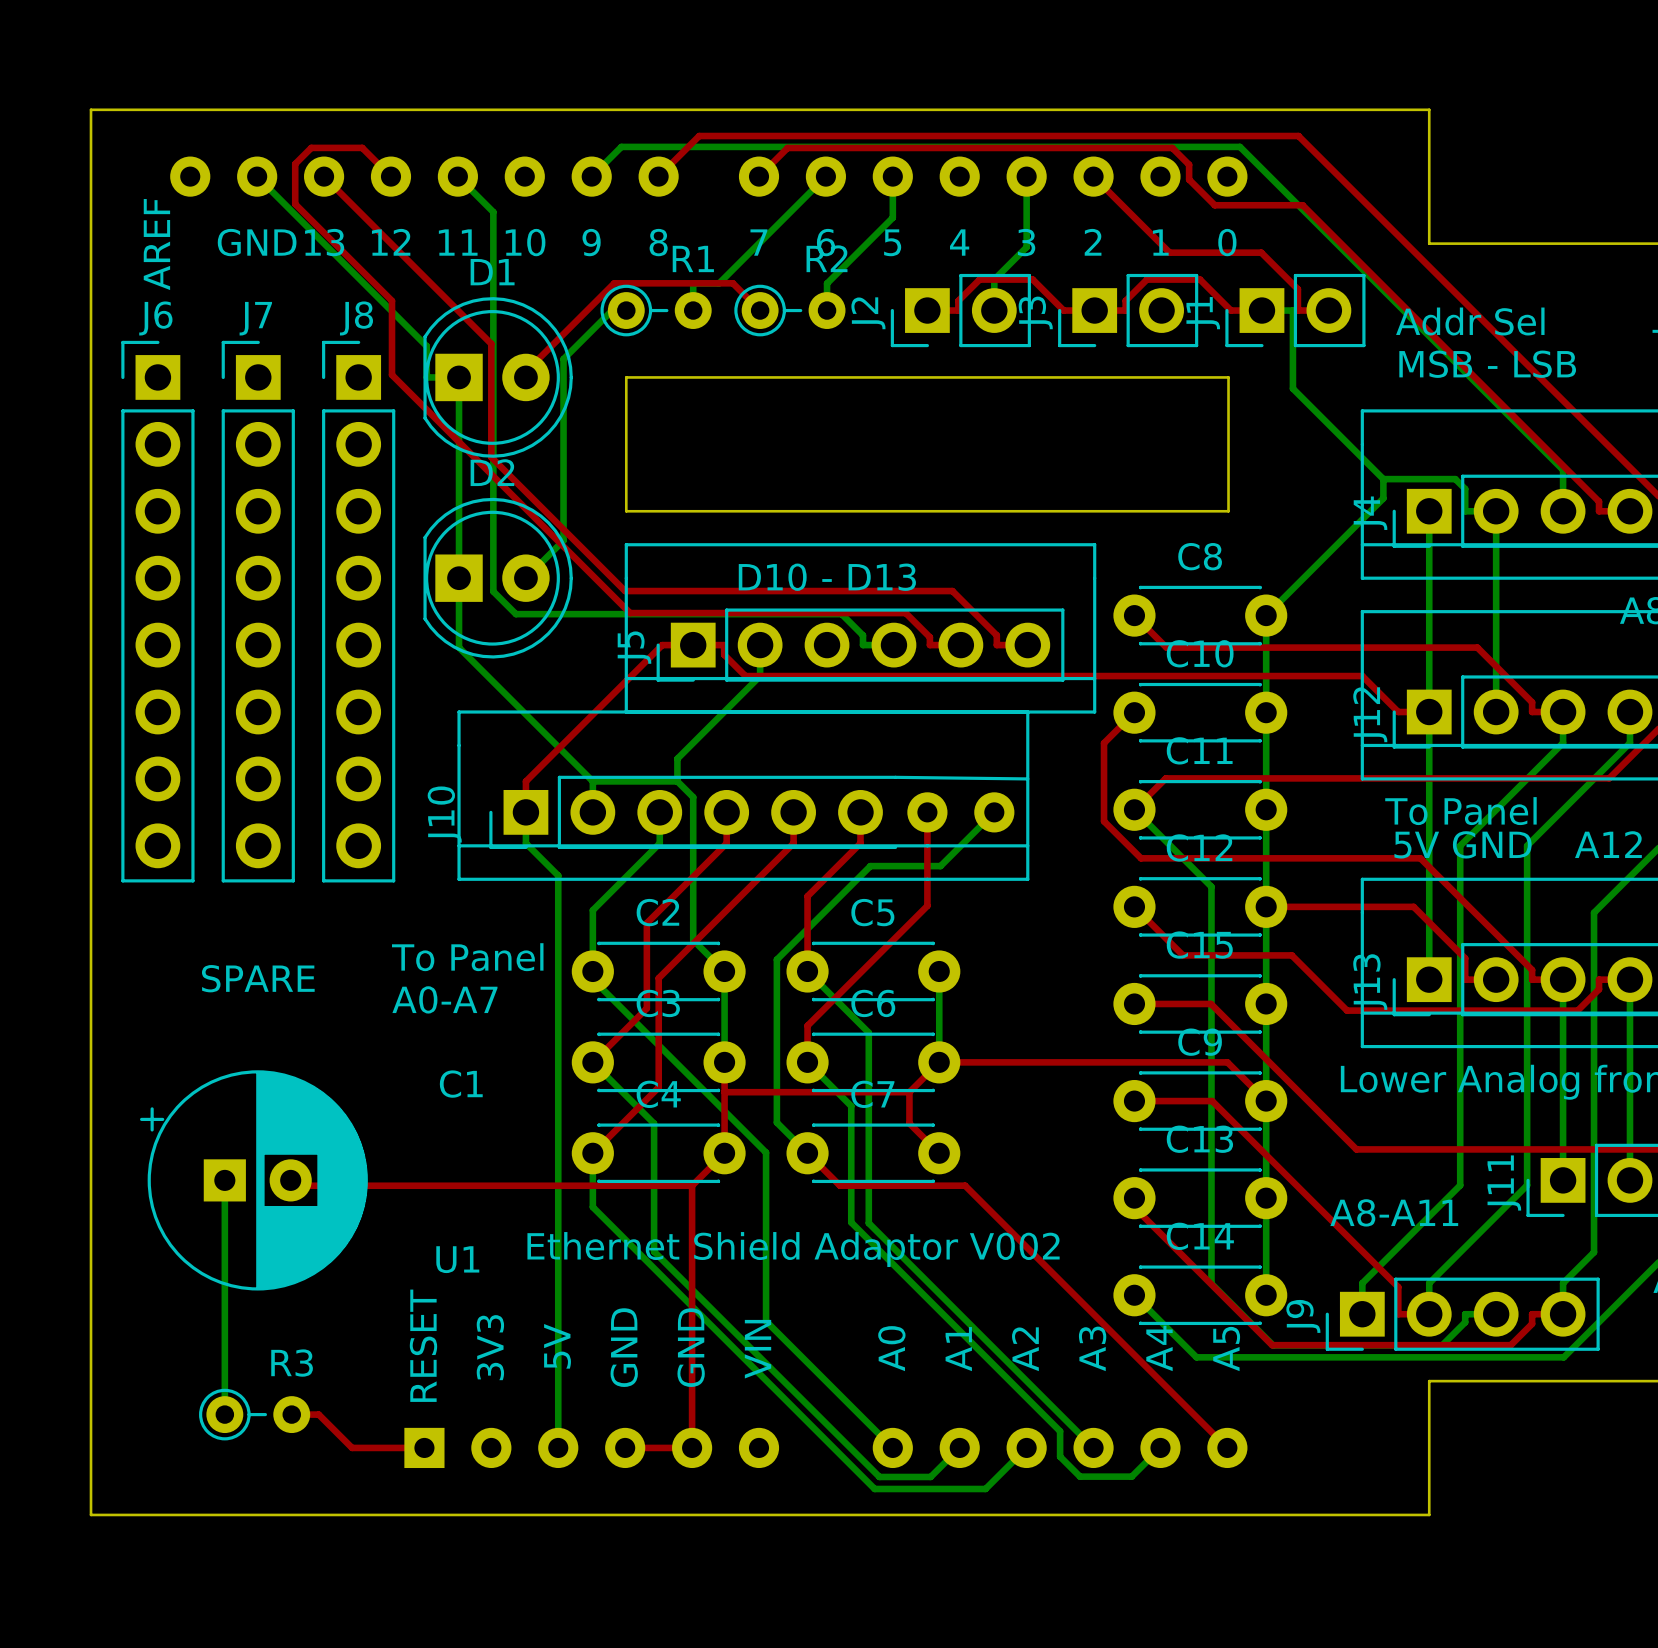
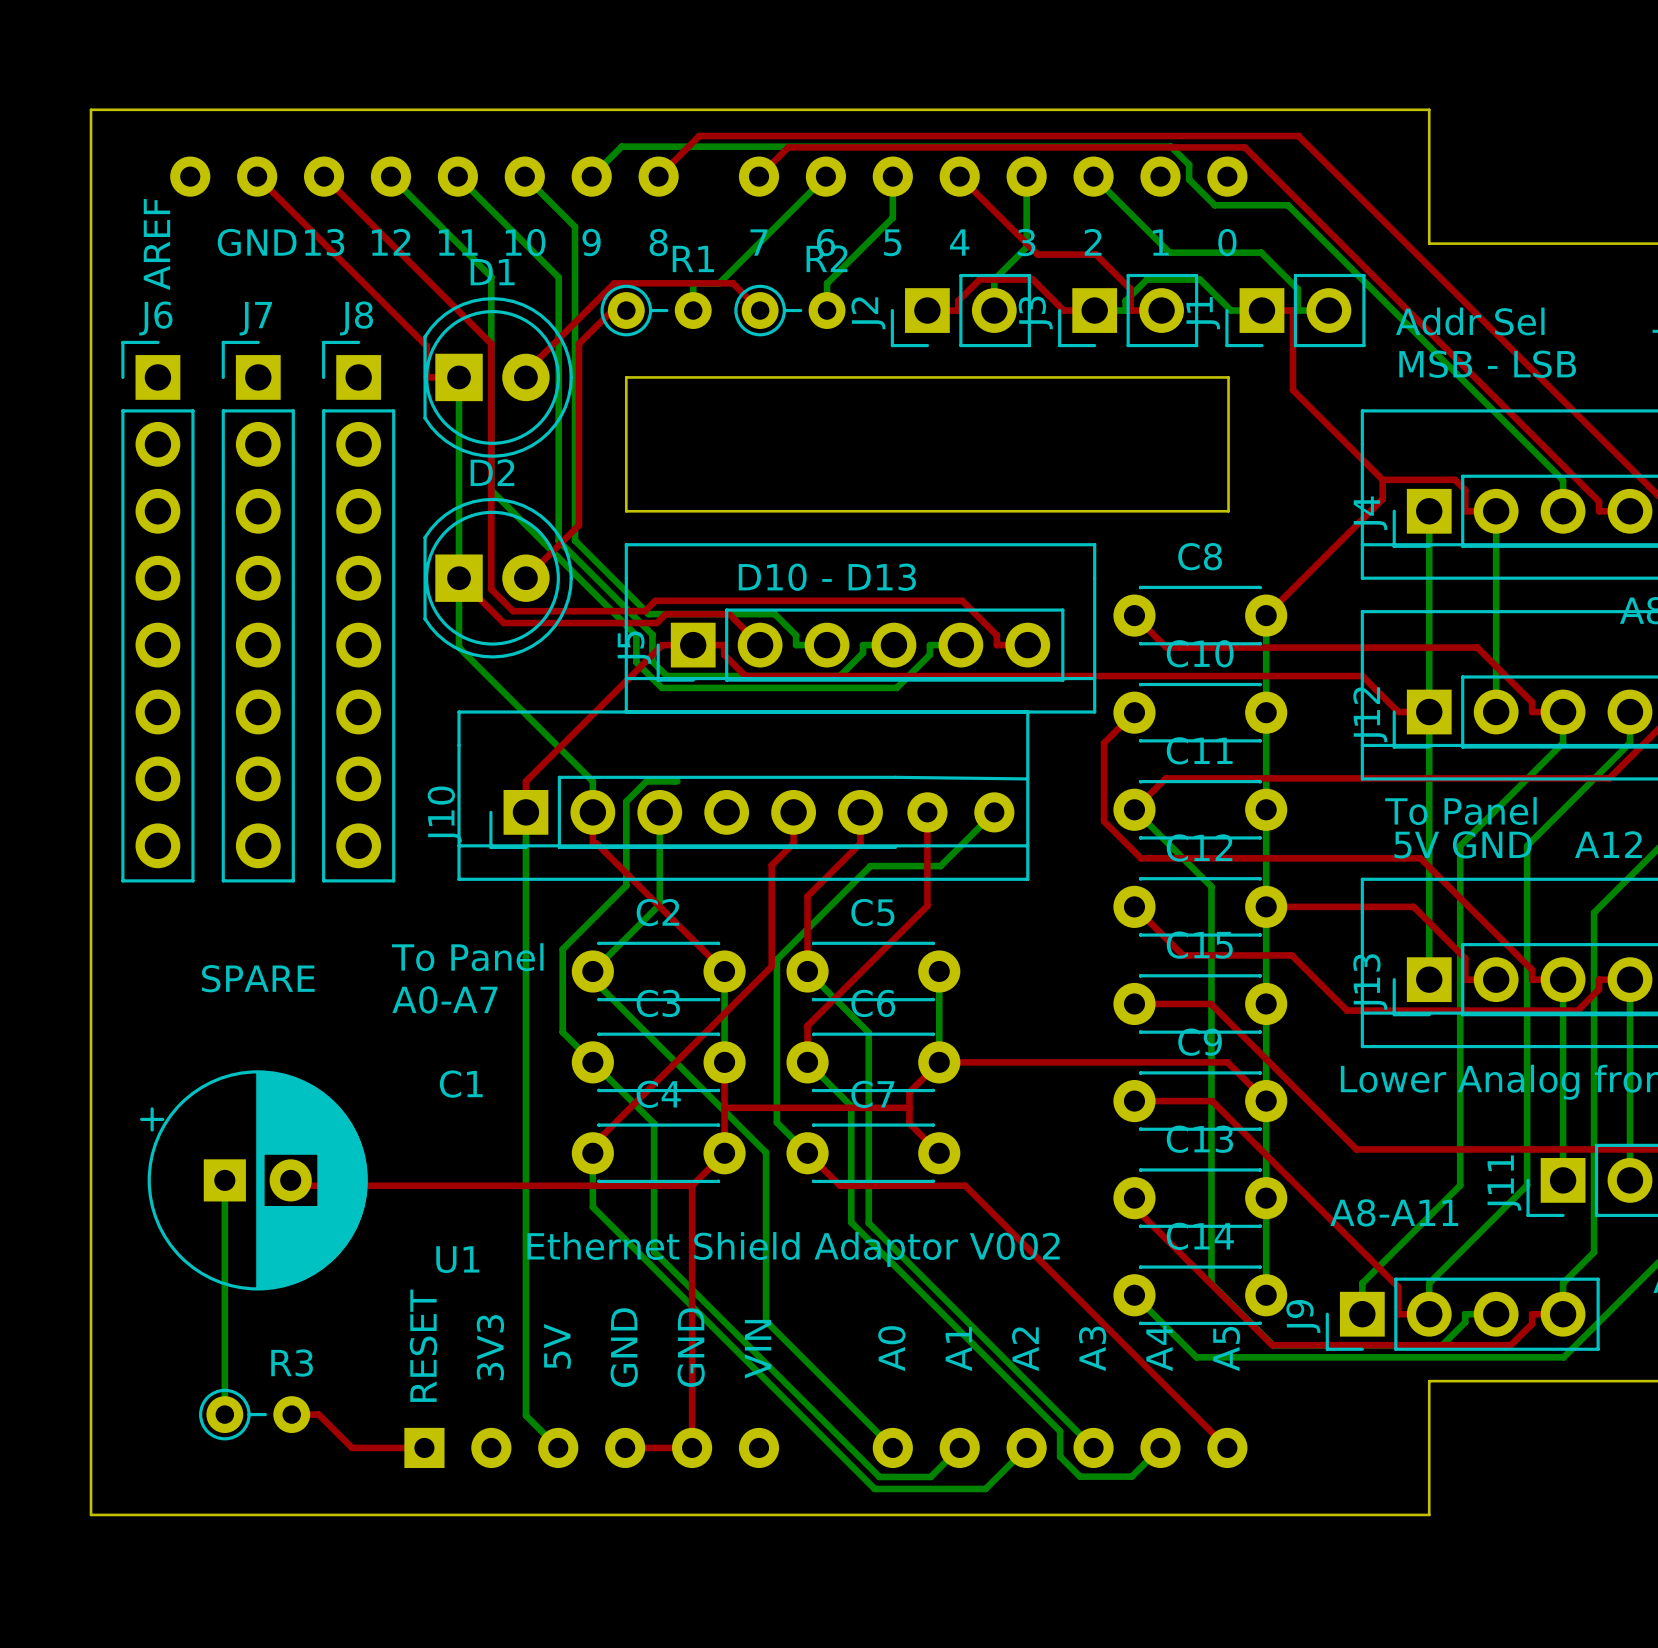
bottom track: (621, 146) (1240, 146) (1563, 469) (1563, 480) -> (621, 146) (1171, 146) (1189, 164) (1189, 179) (1214, 205) (1288, 205) (1563, 480)
top track: (787, 147) (1172, 147) (1189, 164) (1189, 179) (1214, 205) (1302, 205) -> (787, 147) (1244, 147) (1302, 205)
bottom track: (257, 176) (426, 346) (426, 377) (459, 377) -> none
top track: none -> (257, 176) (426, 346) (426, 377) (459, 377)
bottom track: none -> (390, 176) (491, 276) (491, 490) (636, 635) (636, 662) (661, 687) (896, 687) (929, 654) (929, 645) (960, 645)
top track: (390, 176) (362, 147) (311, 147) (295, 163) (295, 204) (392, 300) (392, 374) (630, 613) (905, 613) (929, 637) (929, 645) (960, 645) -> none
top track: none -> (959, 176) (1037, 254) (1095, 254) (1130, 289) (1130, 310) (1161, 310)
bottom track: none -> (1093, 176) (1169, 252) (1261, 252) (1297, 289) (1297, 310) (1328, 310)
top track: (1093, 176) (1169, 252) (1261, 252) (1297, 289) (1297, 310) (1328, 310) -> none
bottom track: (493, 212) (493, 591) (515, 614) (648, 614) -> (524, 176) (575, 226) (575, 540) (648, 614)
bottom track: none -> (493, 212) (558, 277) (558, 540) (652, 634) (652, 661) (666, 676) (839, 676) (863, 653) (863, 645)
bottom track: (626, 310) (612, 310) (563, 359) (563, 540) (525, 578) -> none
top track: none -> (626, 310) (612, 310) (578, 343) (578, 525) (525, 578)
top track: (1094, 310) (1125, 310) (1125, 300) (1146, 279) (1200, 279) (1231, 310) (1261, 310) -> (1382, 479) (1292, 390) (1292, 310) (1261, 310)
bottom track: (1261, 310) (1292, 310) (1292, 388) (1383, 479) -> (1261, 310) (1231, 310) (1200, 279) (1146, 279) (1125, 300) (1125, 310) (1094, 310)
top track: (491, 457) (625, 591) (952, 591) (962, 600) -> (491, 457) (491, 589) (513, 611) (645, 611) (655, 600) (962, 600)
top track: none -> (1382, 479) (1382, 499) (1266, 615)
top track: none -> (1382, 479) (1455, 479) (1465, 489) (1465, 511) (1496, 511)
bottom track: (1383, 479) (1383, 498) (1266, 615) -> none
bottom track: (1383, 479) (1455, 479) (1465, 488) (1465, 511) (1496, 511) -> none
top track: none -> (459, 578) (503, 623) (656, 623) (665, 614) (729, 614) (760, 645)
bottom track: (774, 614) (841, 614) (863, 635) (863, 645) -> (774, 614) (796, 635) (796, 645) (827, 645)
bottom track: (760, 645) (760, 676) (677, 758) (677, 781) (693, 797) (693, 940) (724, 971) -> none
bottom track: (592, 781) (646, 781) -> (592, 1062) (562, 1032) (562, 949) (626, 885) (626, 801) (646, 781)
top track: none -> (592, 812) (592, 843) (596, 843) (724, 971)
top track: (726, 812) (726, 843) (646, 923) (646, 1008) (592, 1062) -> none
bottom track: (525, 843) (558, 875) (558, 1447) -> (525, 843) (525, 1415) (558, 1447)
bottom track: (659, 843) (592, 910) (592, 971) -> (659, 843) (659, 904) (592, 971)
top track: (771, 865) (658, 978) (658, 1087) (592, 1153) -> (771, 865) (771, 966) (592, 1145) (592, 1153)
top track: (724, 1092) (909, 1092) -> (724, 1107) (909, 1107)

